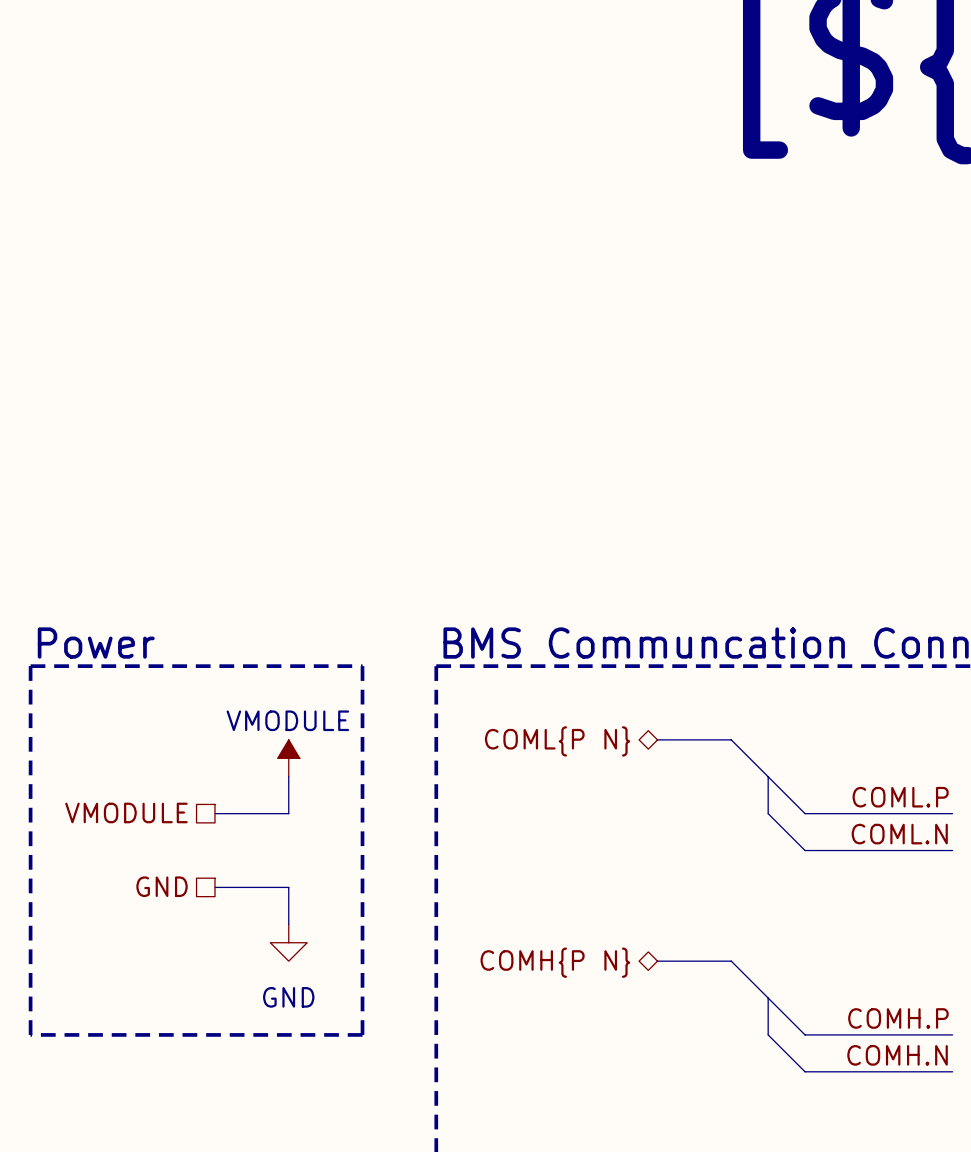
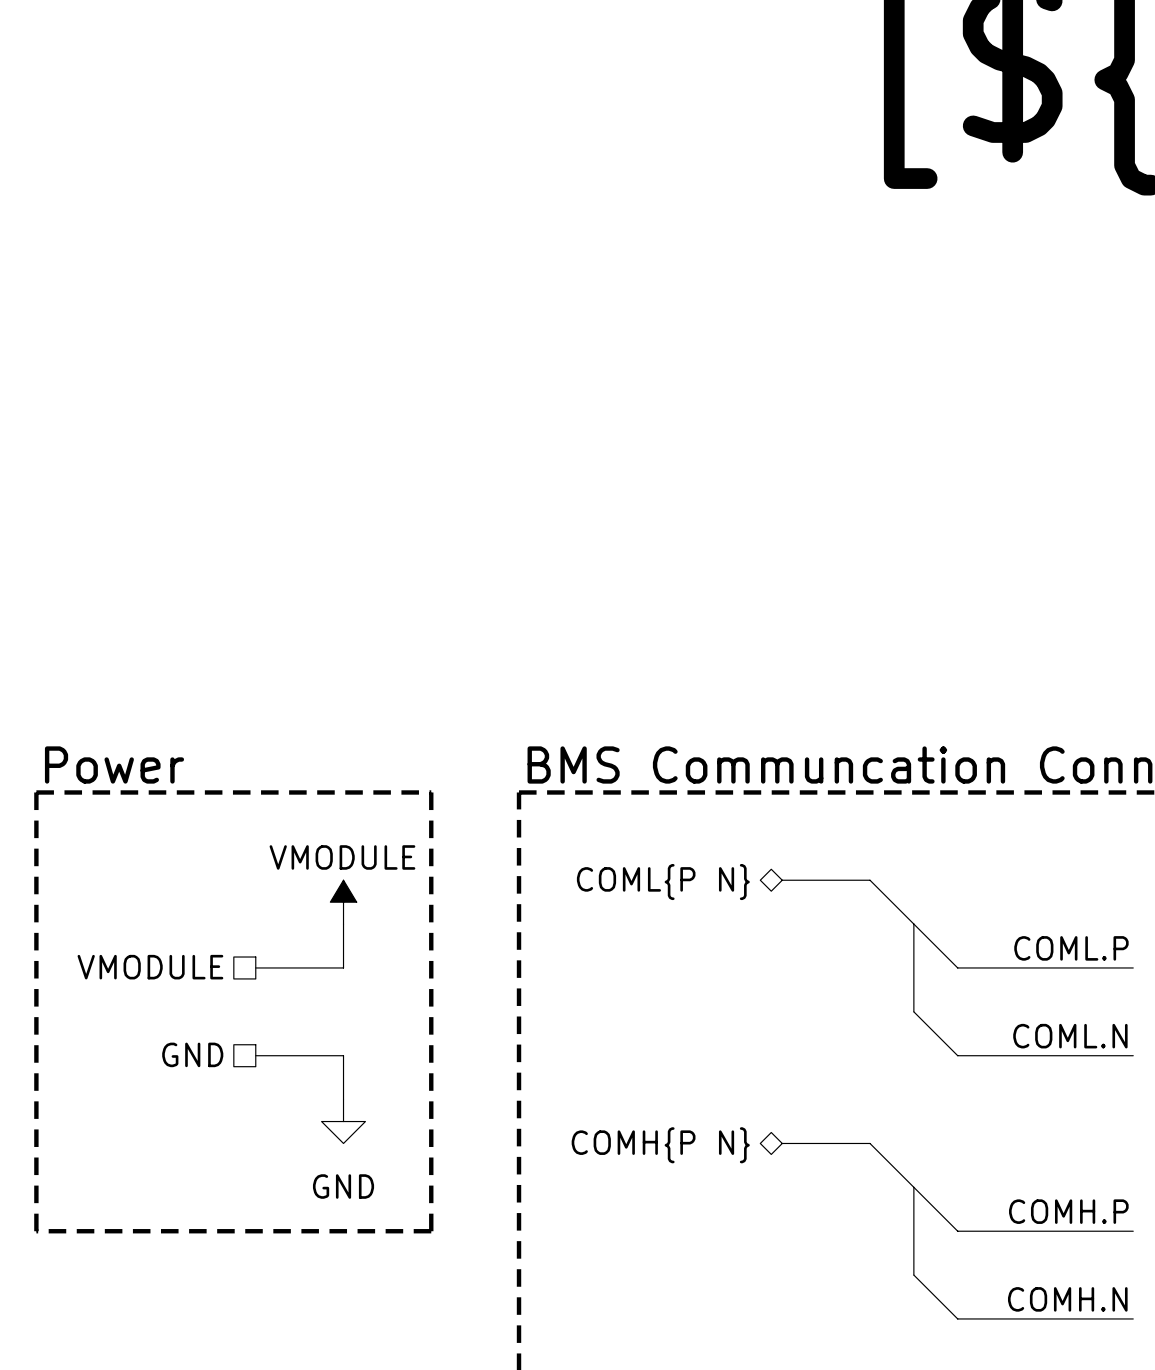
wire: (768, 813) (805, 850) (952, 850) -> (913, 1011) (957, 1055) (1133, 1055)
bus: none -> (913, 967) (913, 1011)
label position: COML.N (899, 834) -> COML.N (1070, 1036)
wire: (768, 1034) (805, 1071) (952, 1071) -> (913, 1275) (957, 1318) (1133, 1318)
bus: none -> (913, 1231) (913, 1275)
label position: COMH.N (897, 1055) -> COMH.N (1067, 1299)

